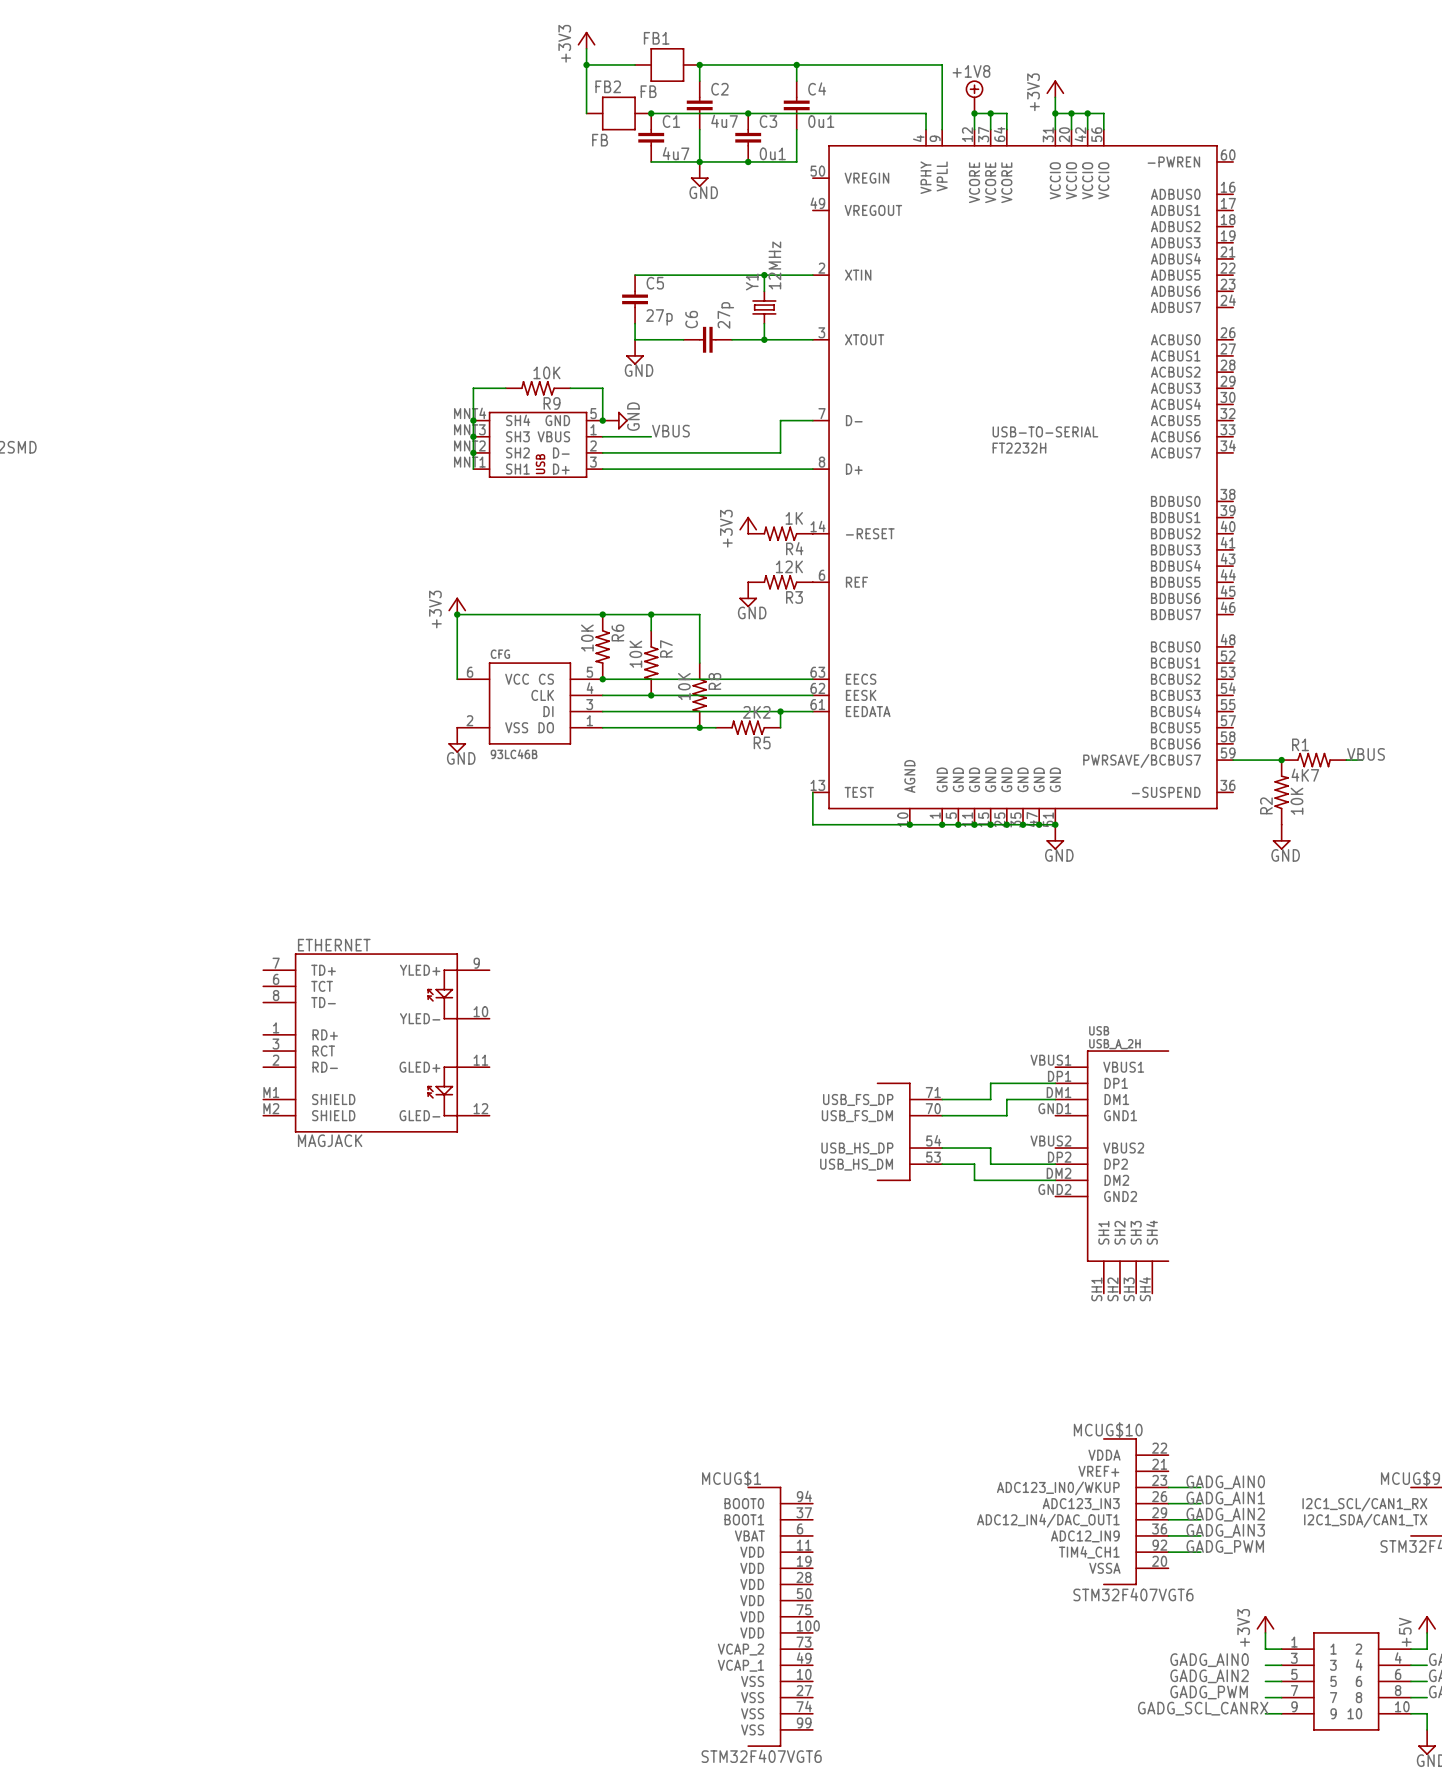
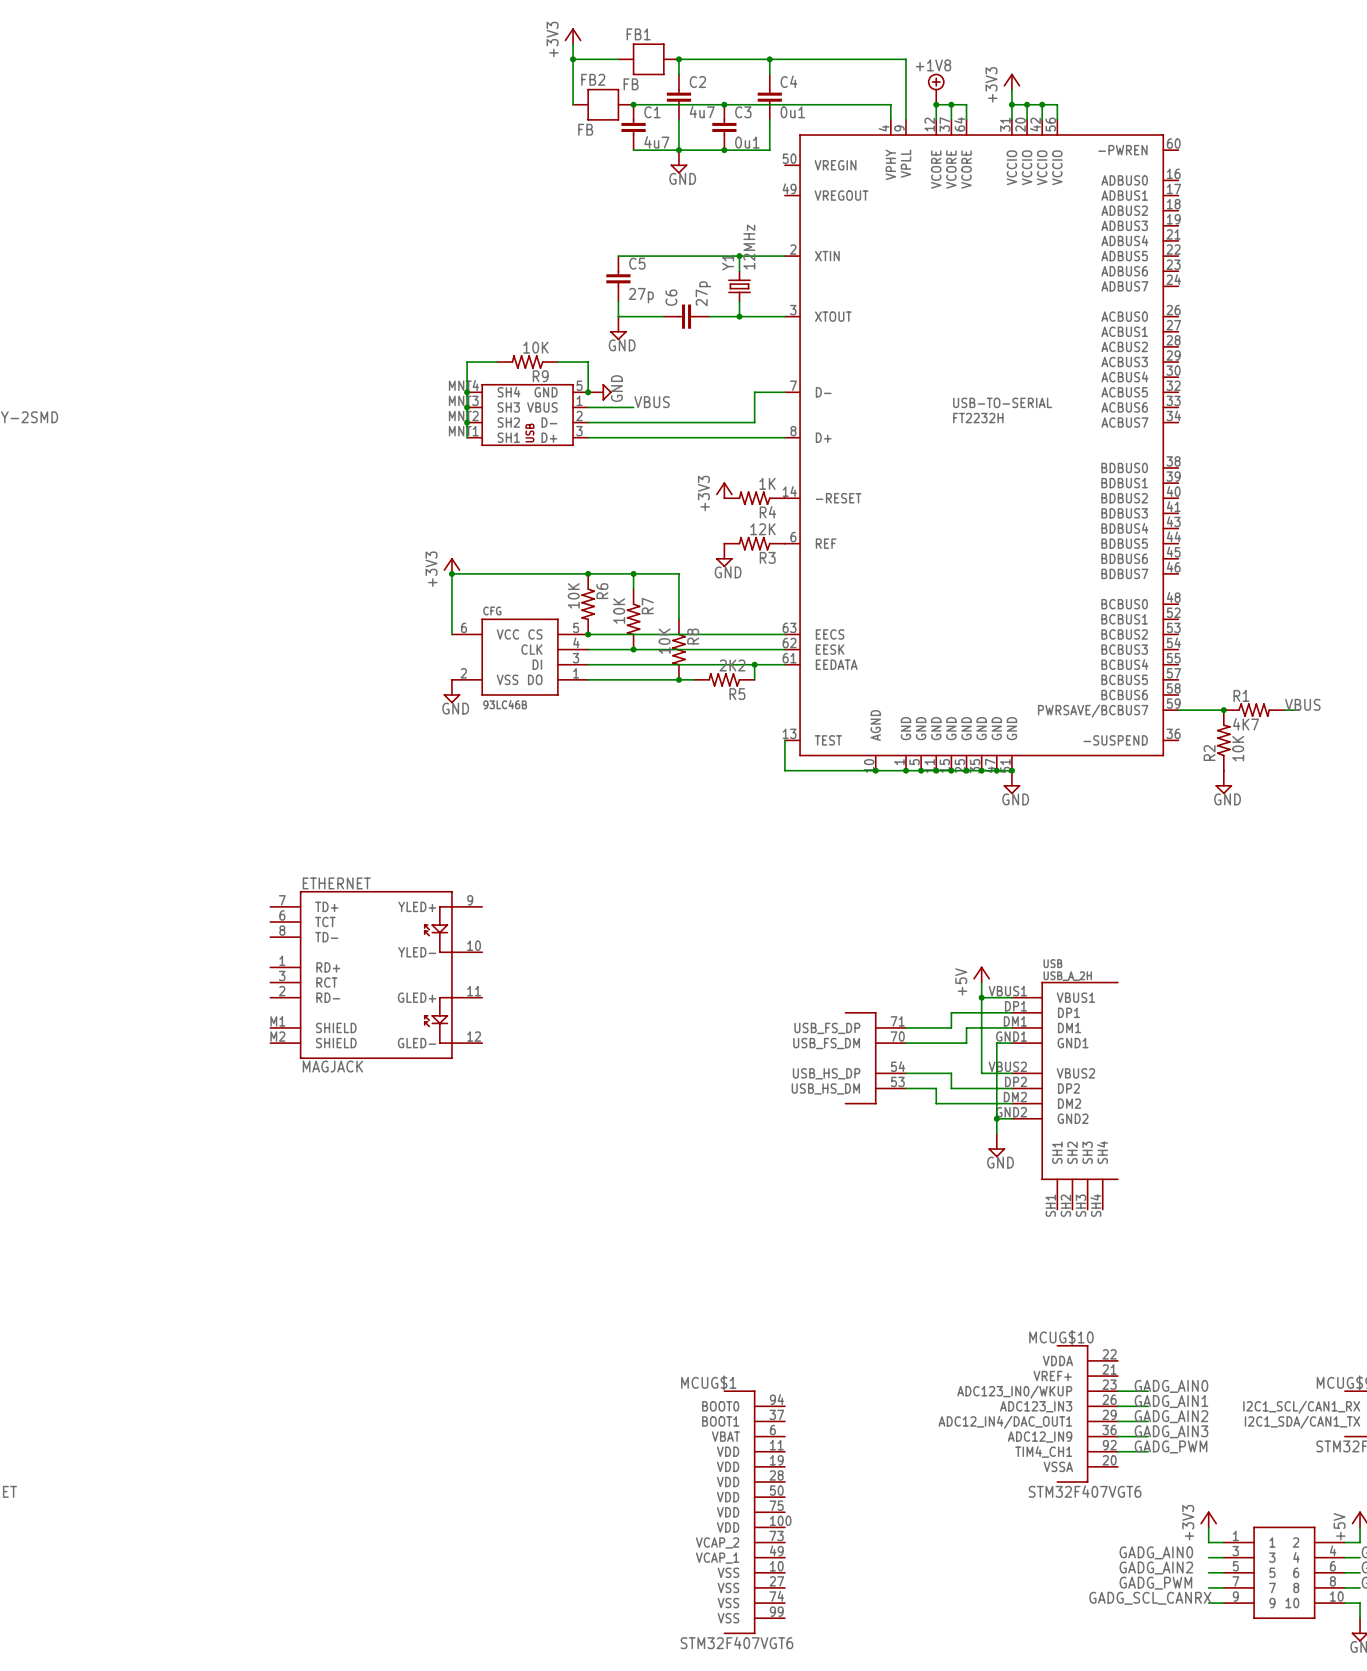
power symbol: none -> +5V (981, 974)
wire: none -> (981, 982) (981, 1073) (1011, 1073)
wire: none -> (981, 997) (1011, 997)
junction: none -> (981, 997)
wire: none -> (1011, 1043) (996, 1043) (996, 1133)
wire: none -> (996, 1118) (1011, 1118)
junction: none -> (996, 1118)
power symbol: none -> GND (996, 1145)

